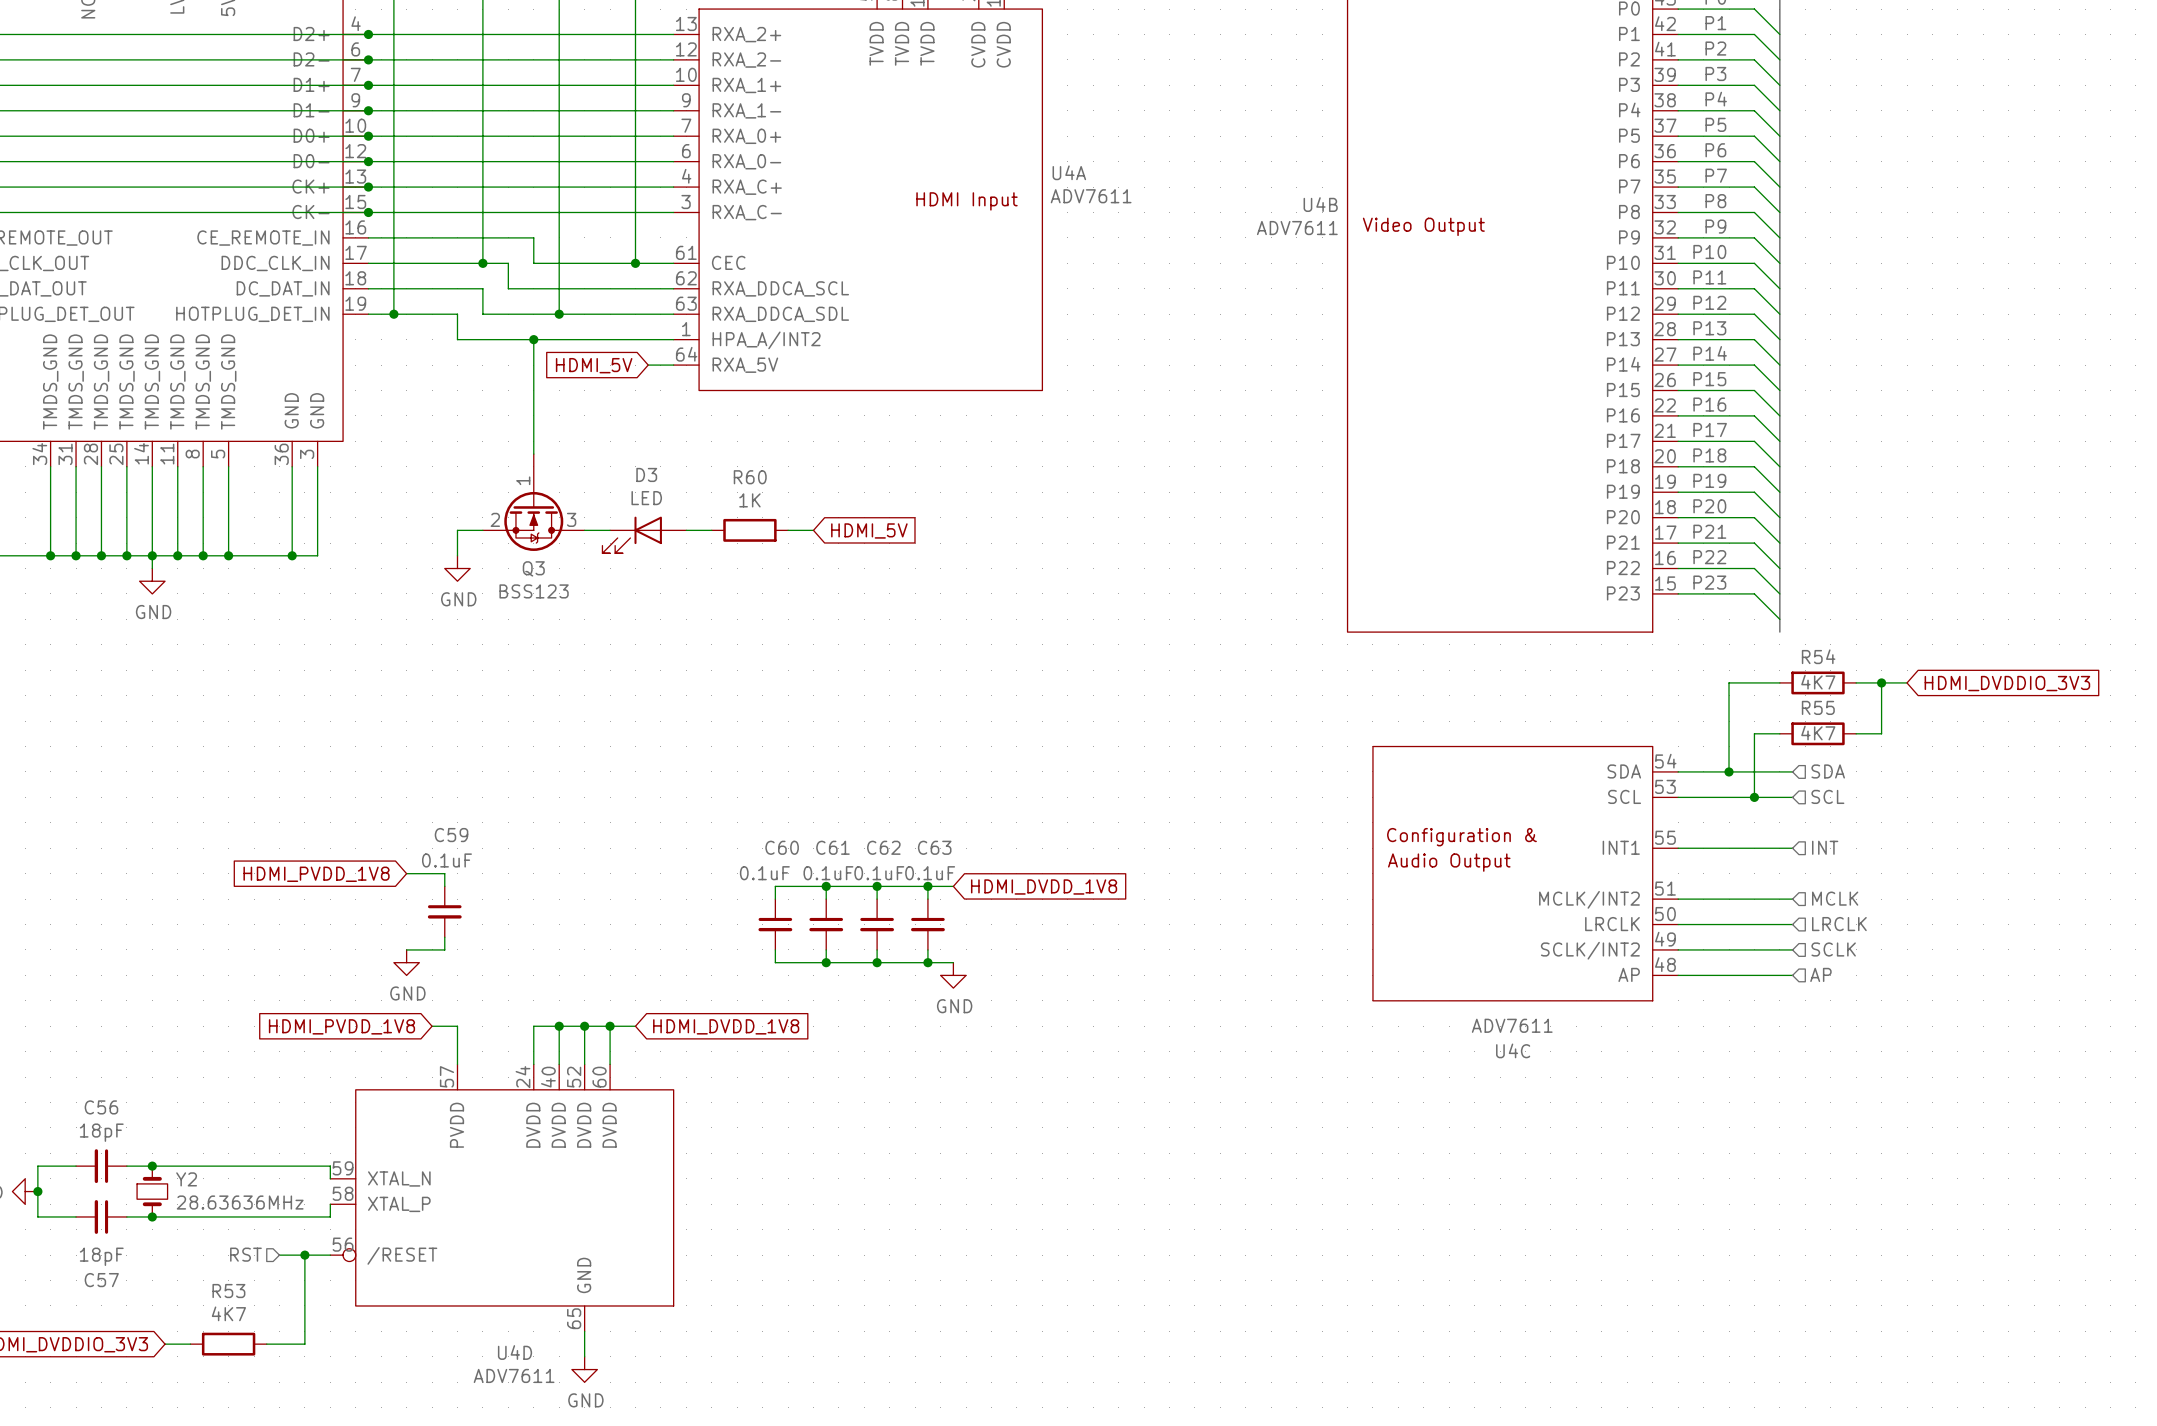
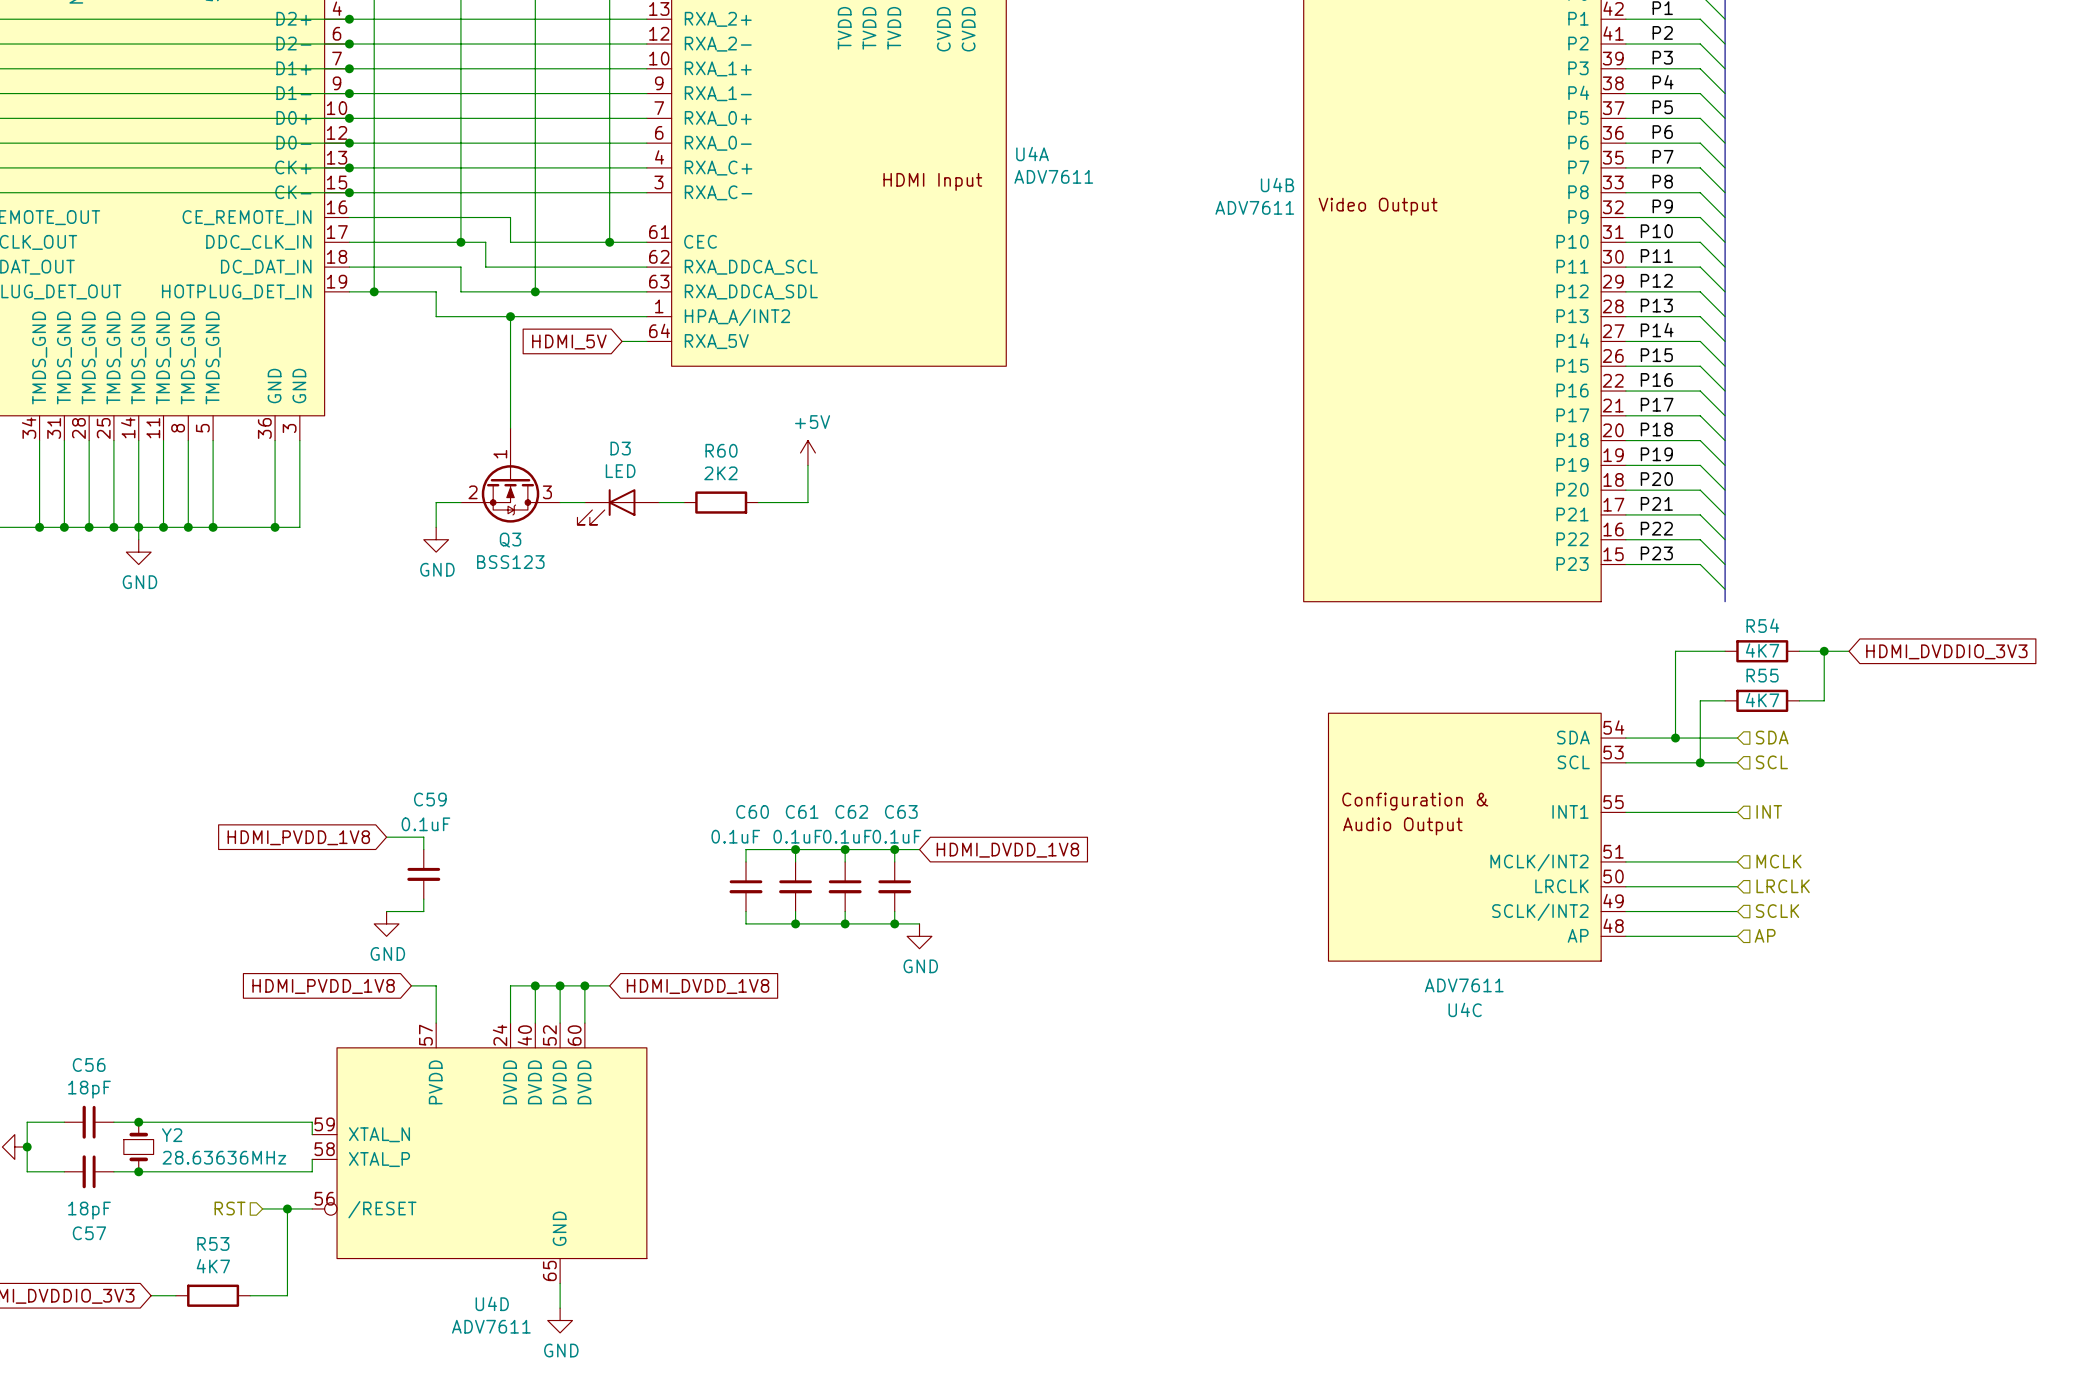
power symbol: none -> +5V (807, 452)
wire: none -> (807, 465) (807, 502) (783, 502)
R60 value: 1K (749, 500) -> 2K2 (720, 473)
global label: HDMI_5V (869, 530) -> none

